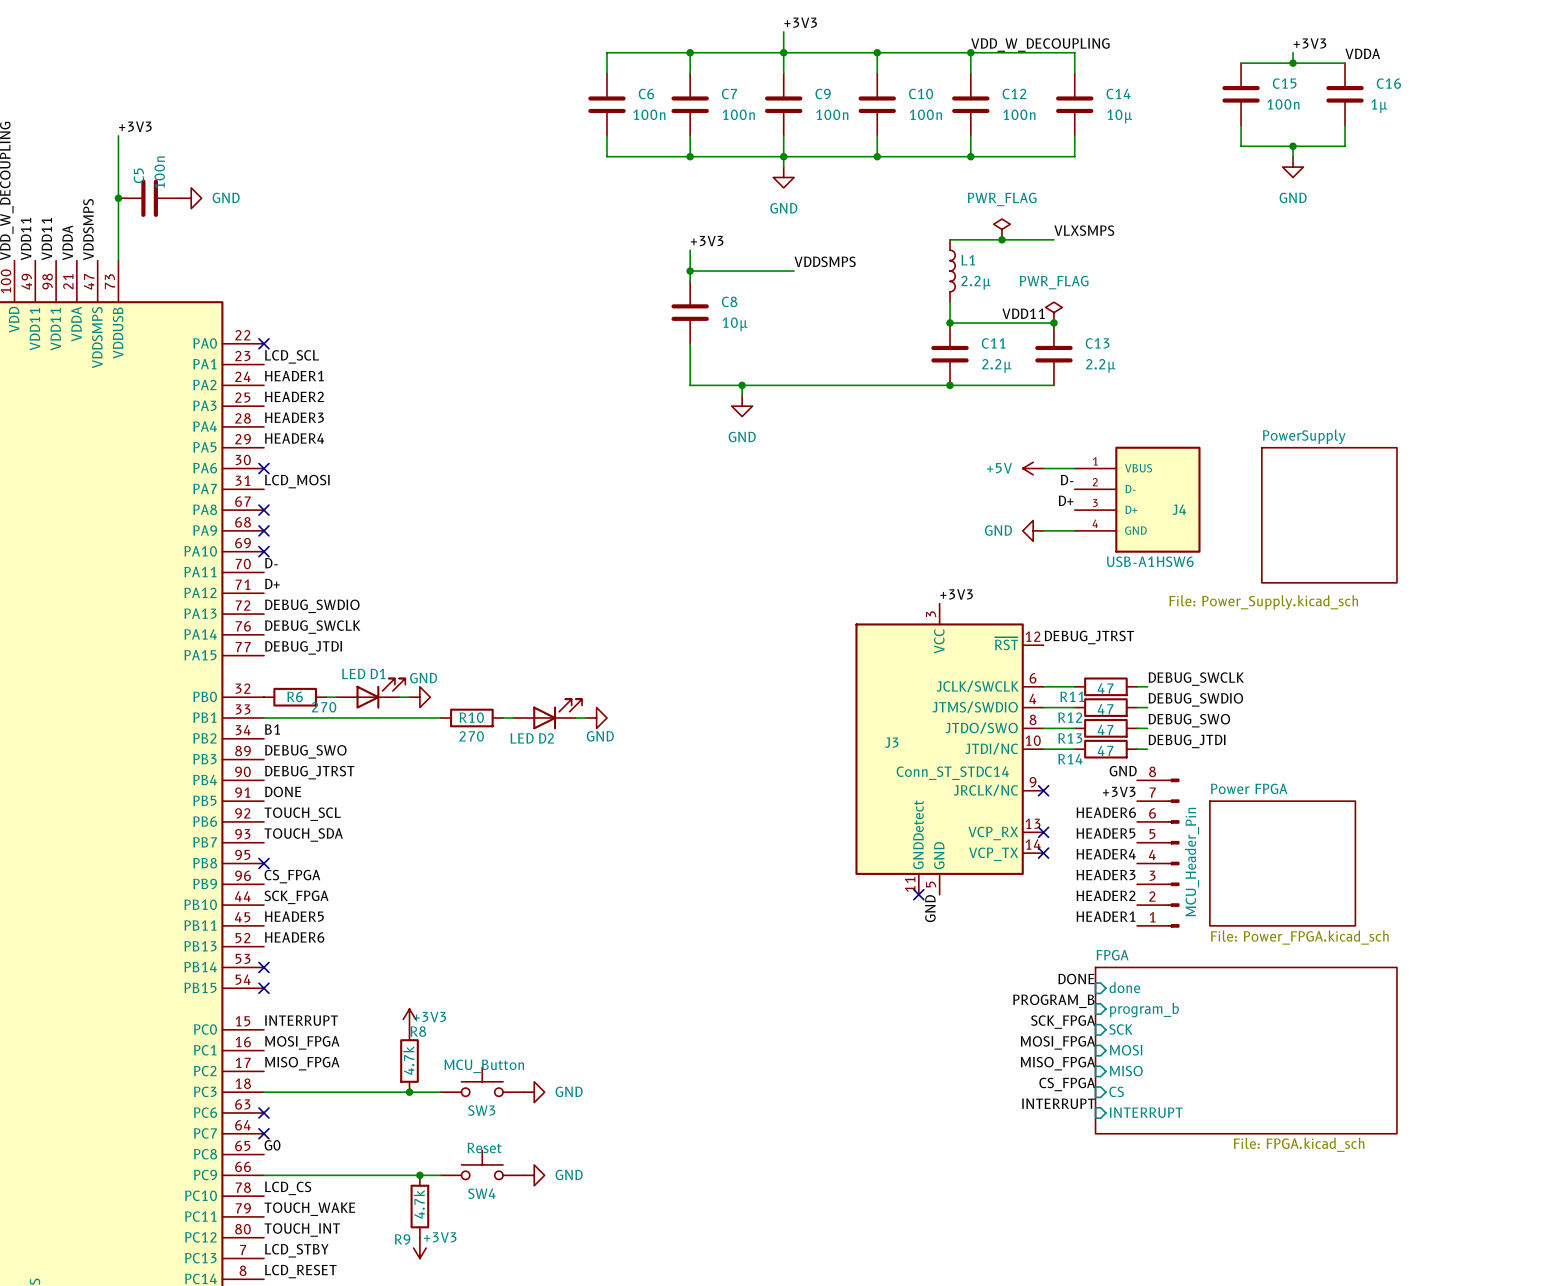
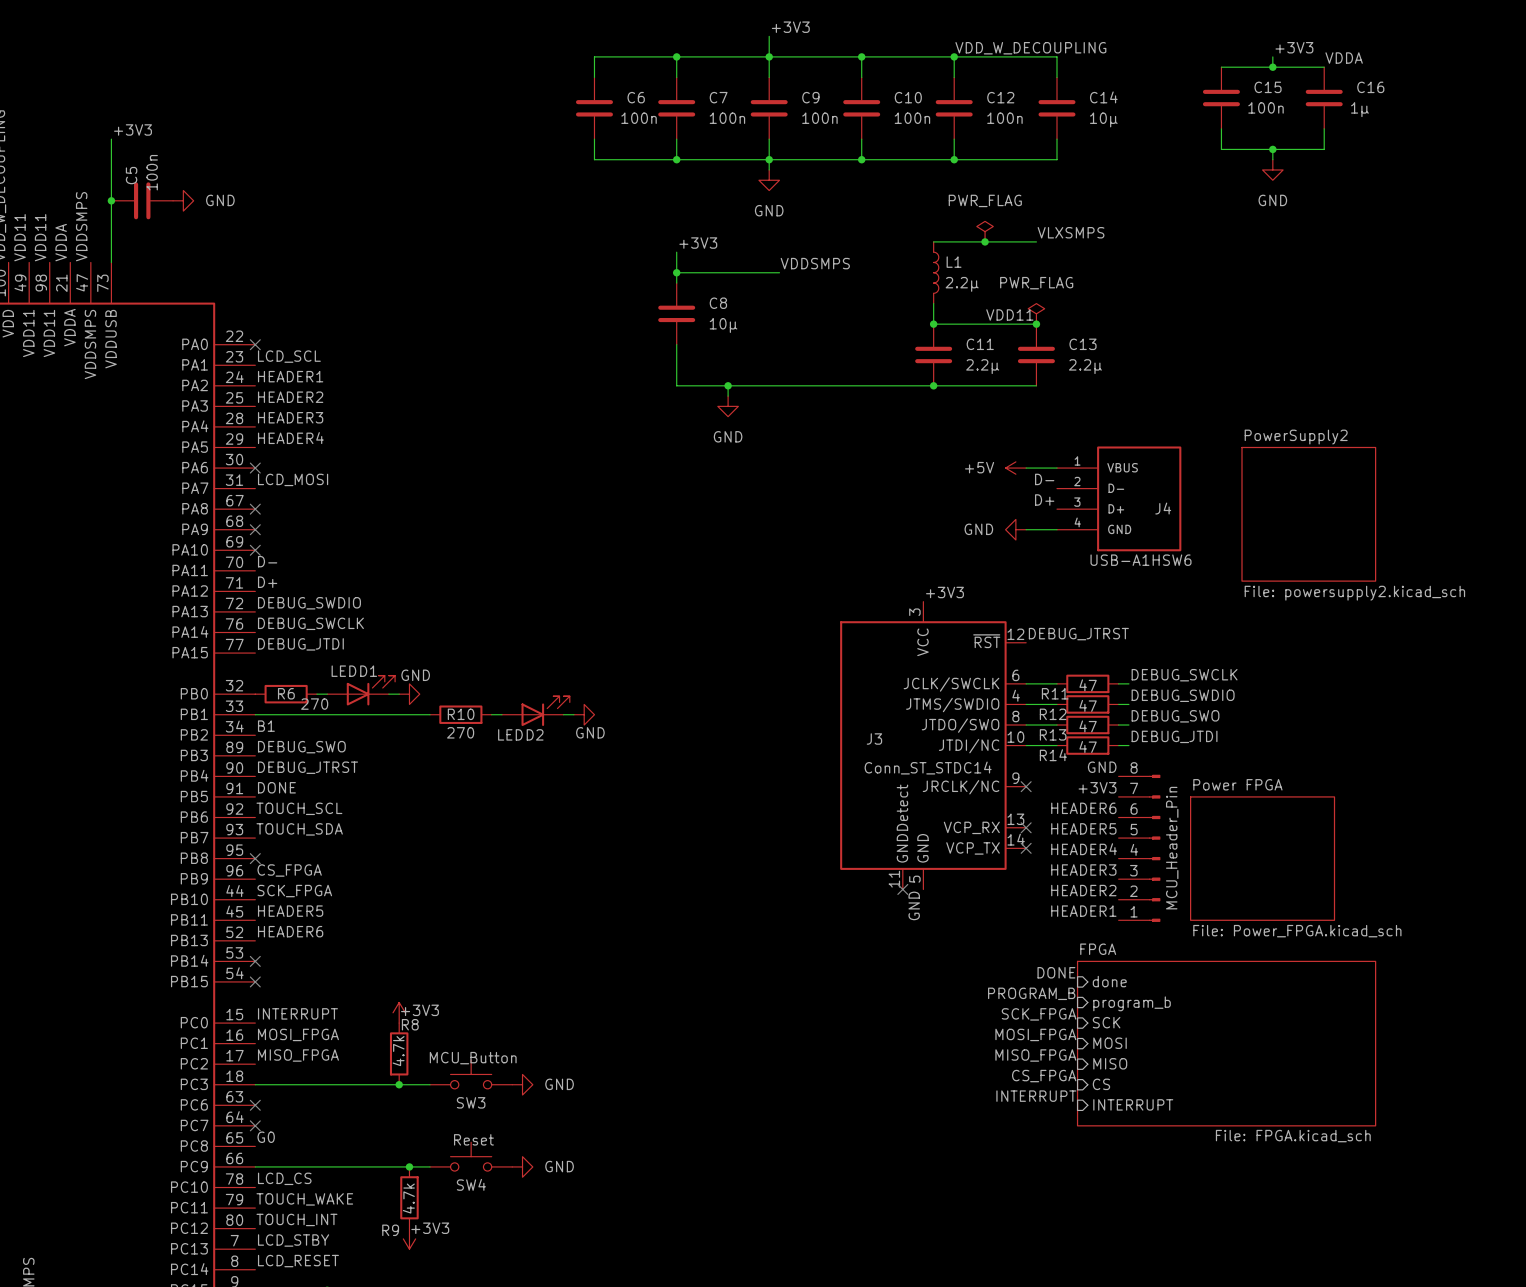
sheet PowerSupply name: PowerSupply (1304, 436) -> PowerSupply2 (1296, 437)
sheet PowerSupply value: File: Power_Supply.kicad_sch (1263, 602) -> File: powersupply2.kicad_sch (1354, 593)

